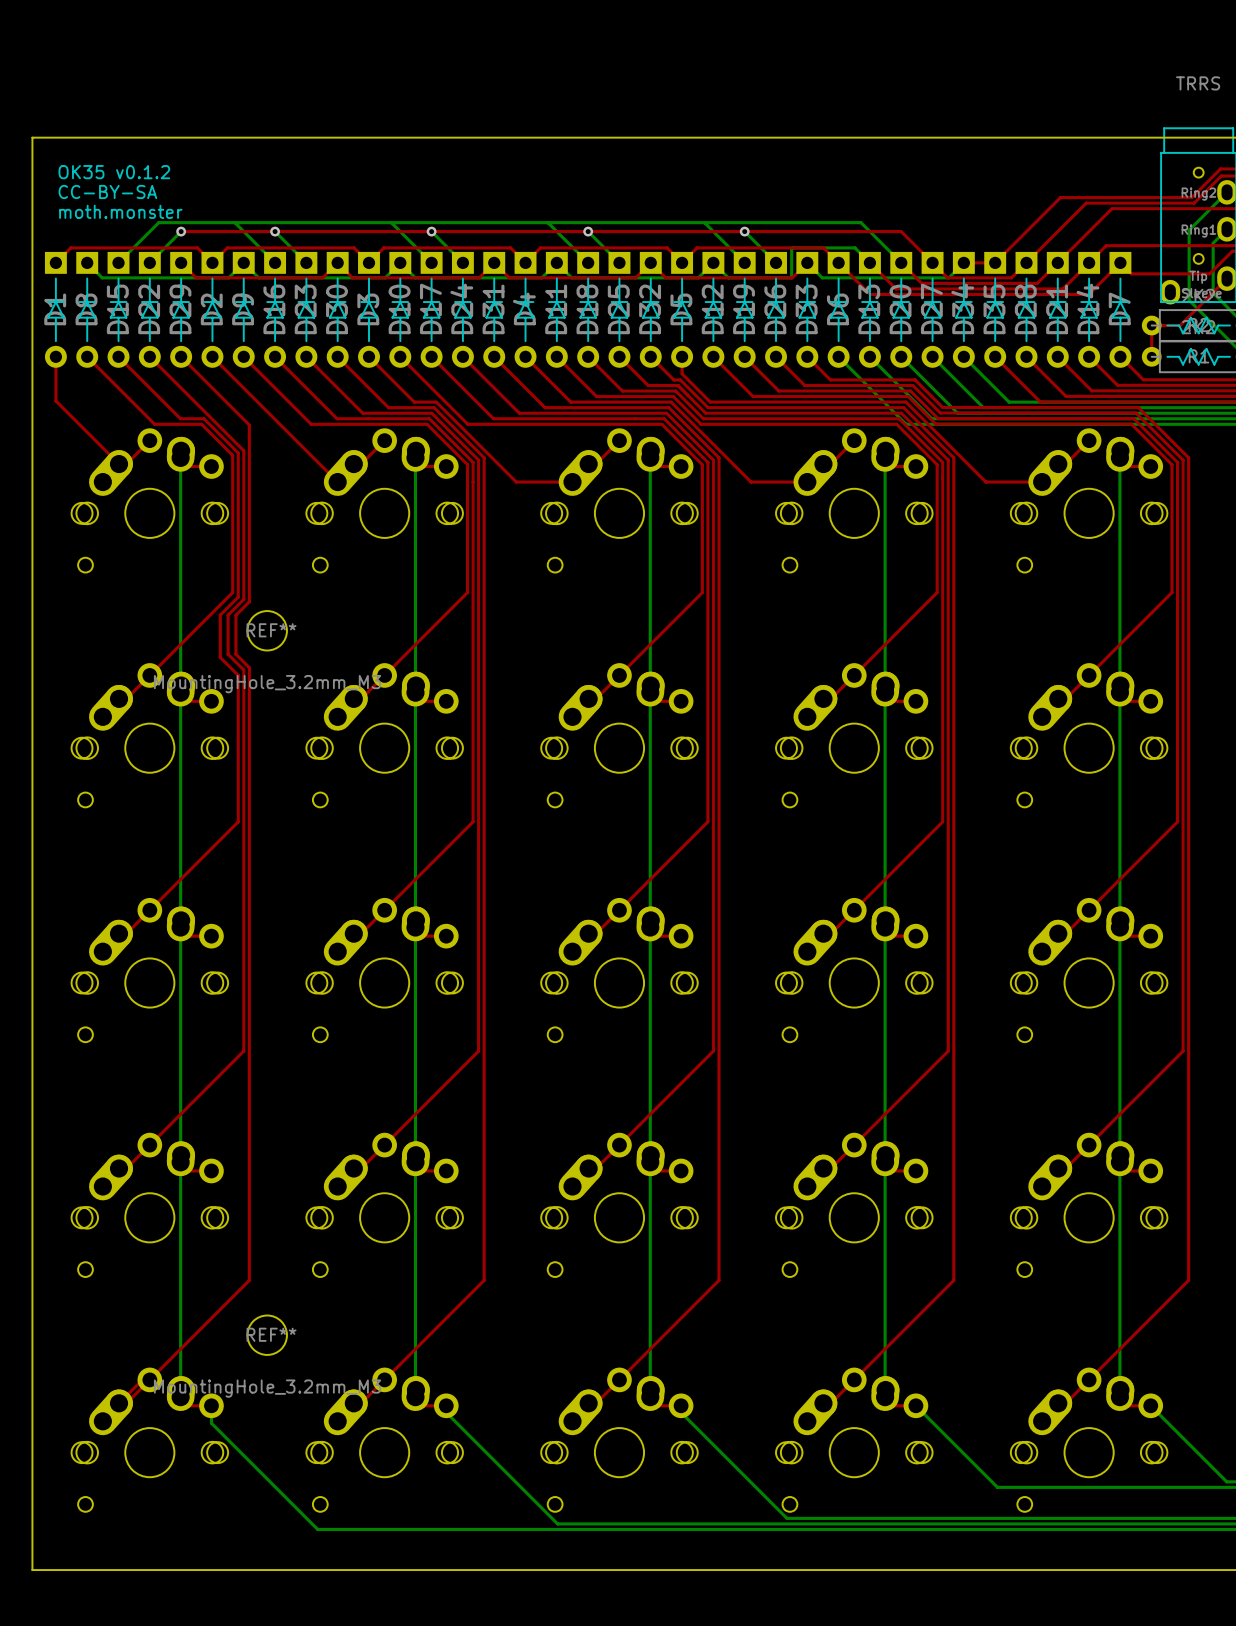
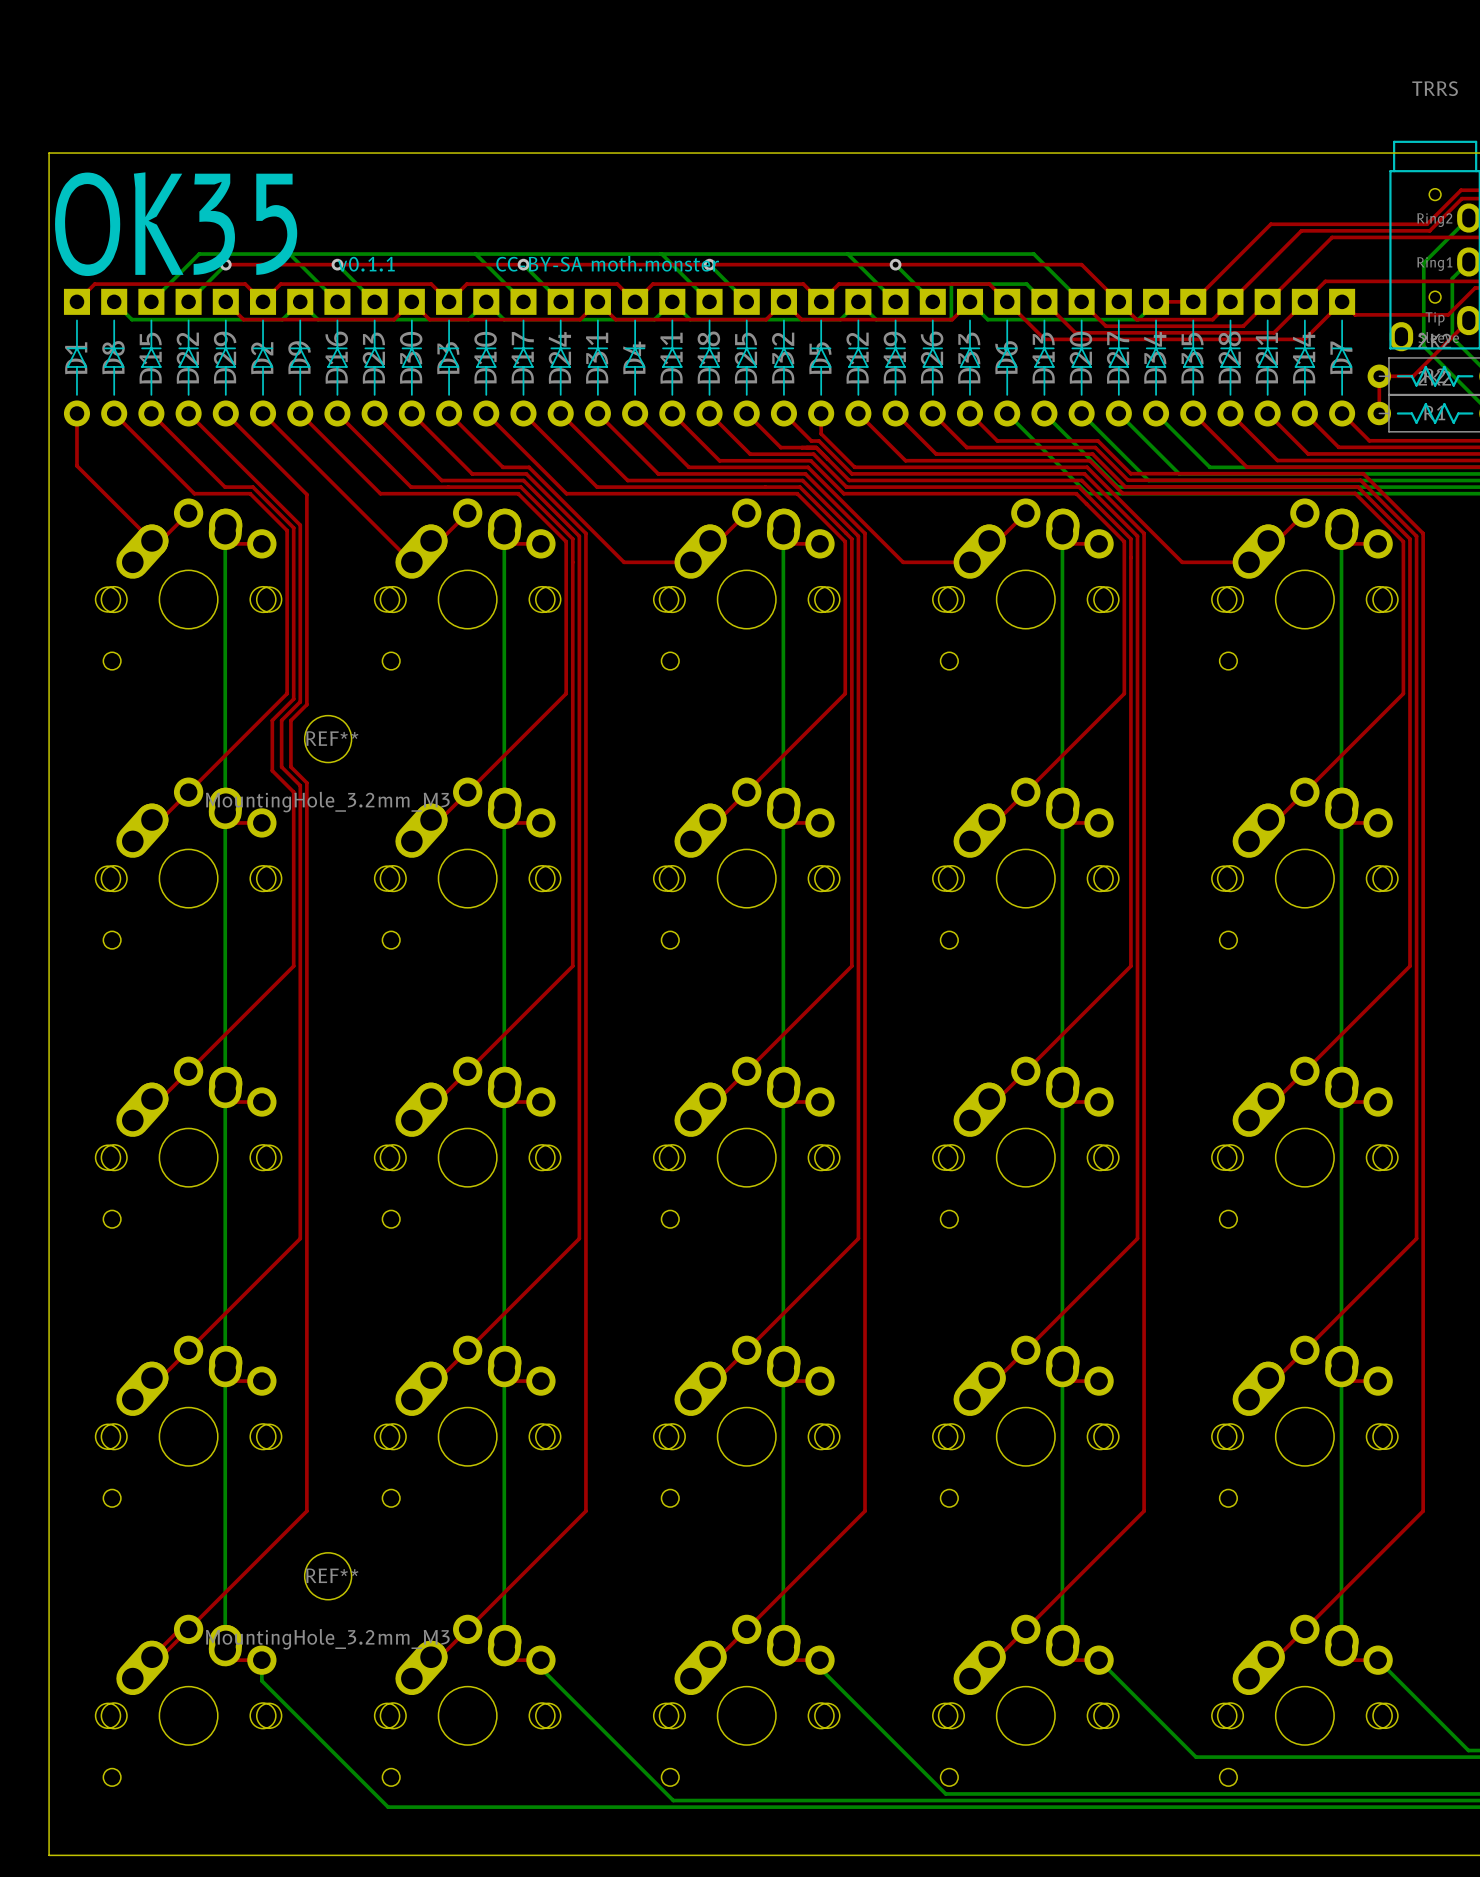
text: OK35 v0.1.2 (114, 172) -> none
text: CC-BY-SA (107, 191) -> none
text: none -> OK35 (176, 224)
text: moth.monster (120, 211) -> none
text: none -> v0.1.1 (366, 264)
text: none -> CC-BY-SA moth.monster (607, 263)

